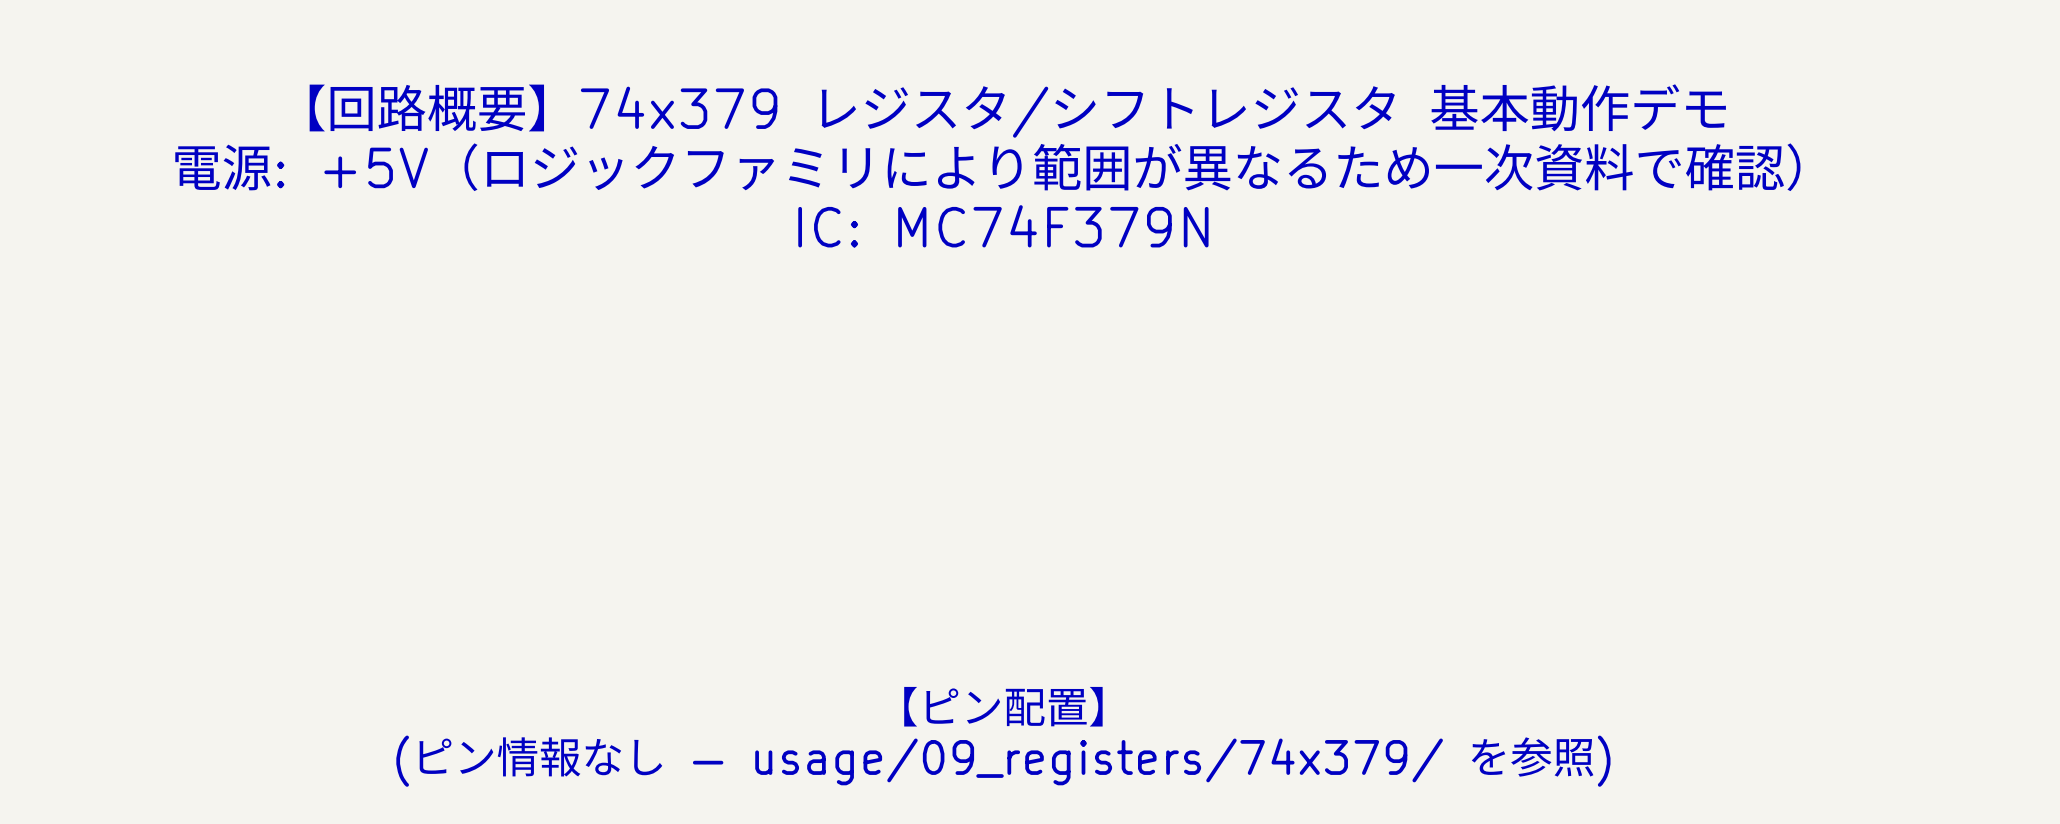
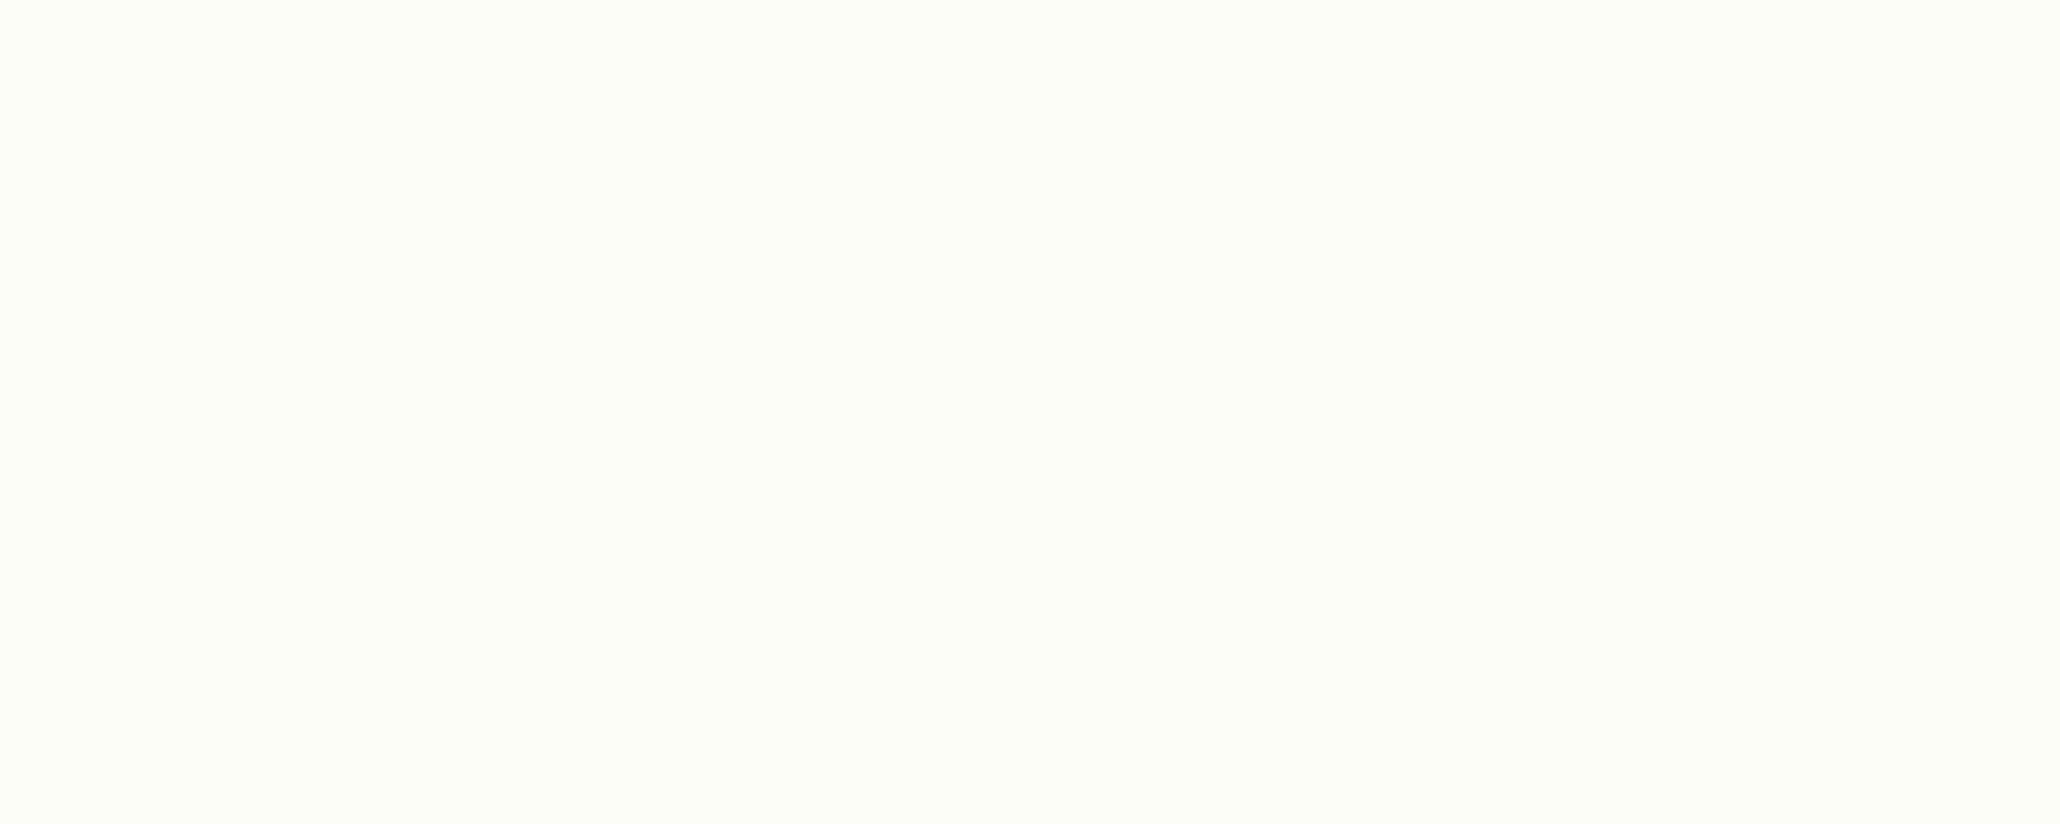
text: 【回路概要】74x379 レジスタ/シフトレジスタ 基本動作デモ (1017, 110) -> none
text: 電源: +5V（ロジックファミリにより範囲が異なるため一次資料で確認） (987, 167) -> none
text: IC: MC74F379N (1003, 226) -> none
text: 【ピン配置】 (1003, 706) -> none
text: (ピン情報なし — usage/09_registers/74x379/ を参照) (1003, 761) -> none

